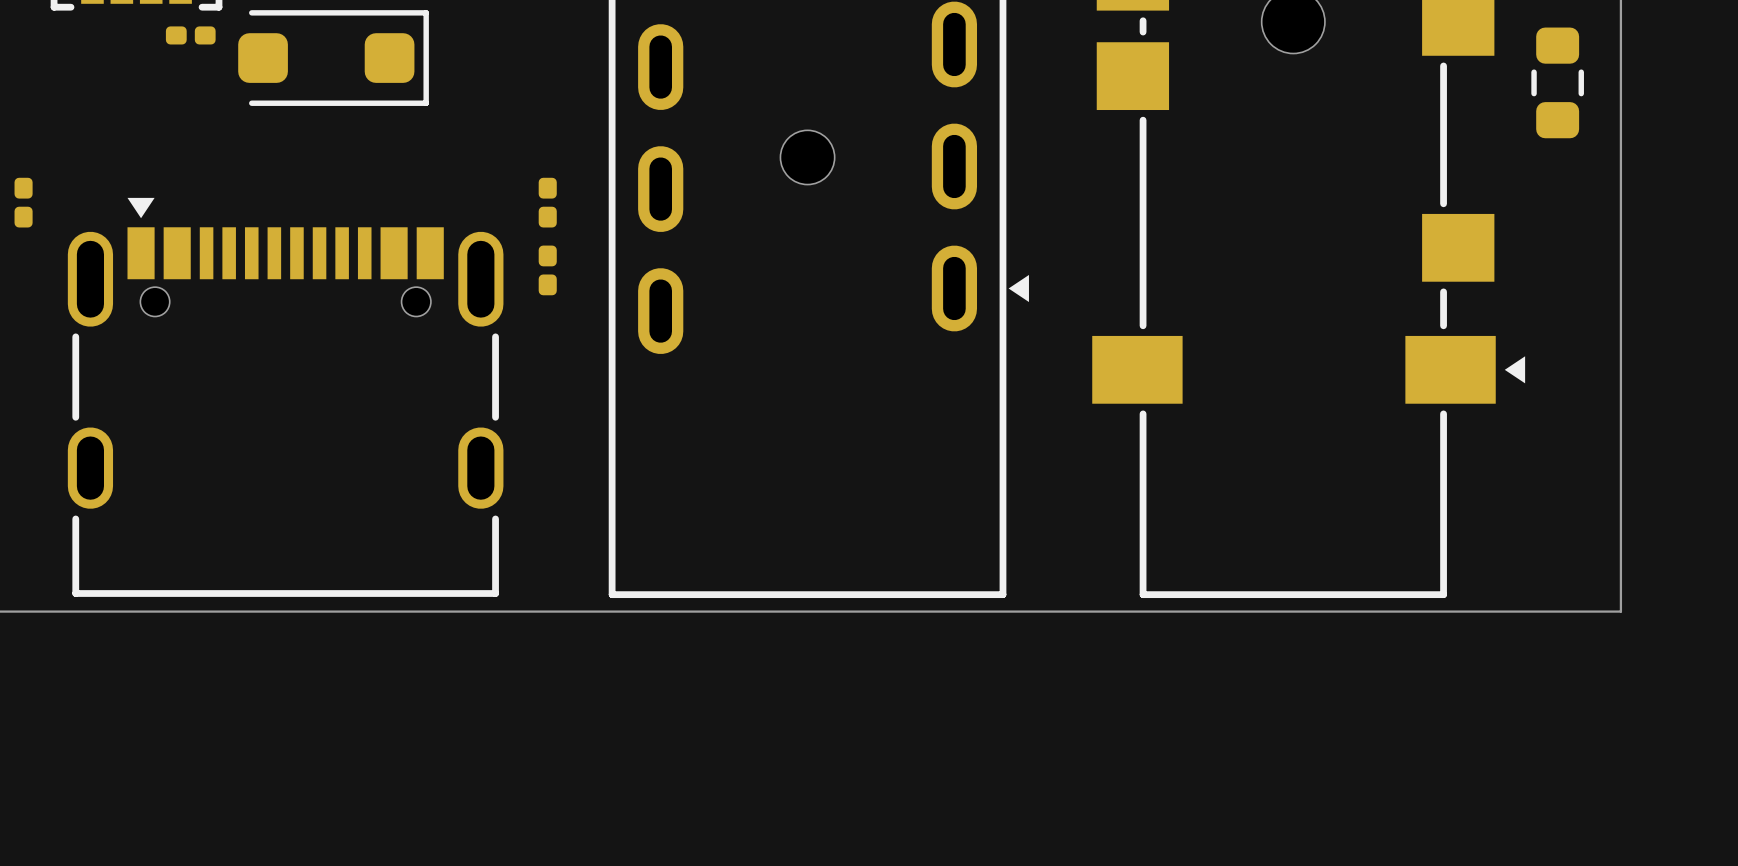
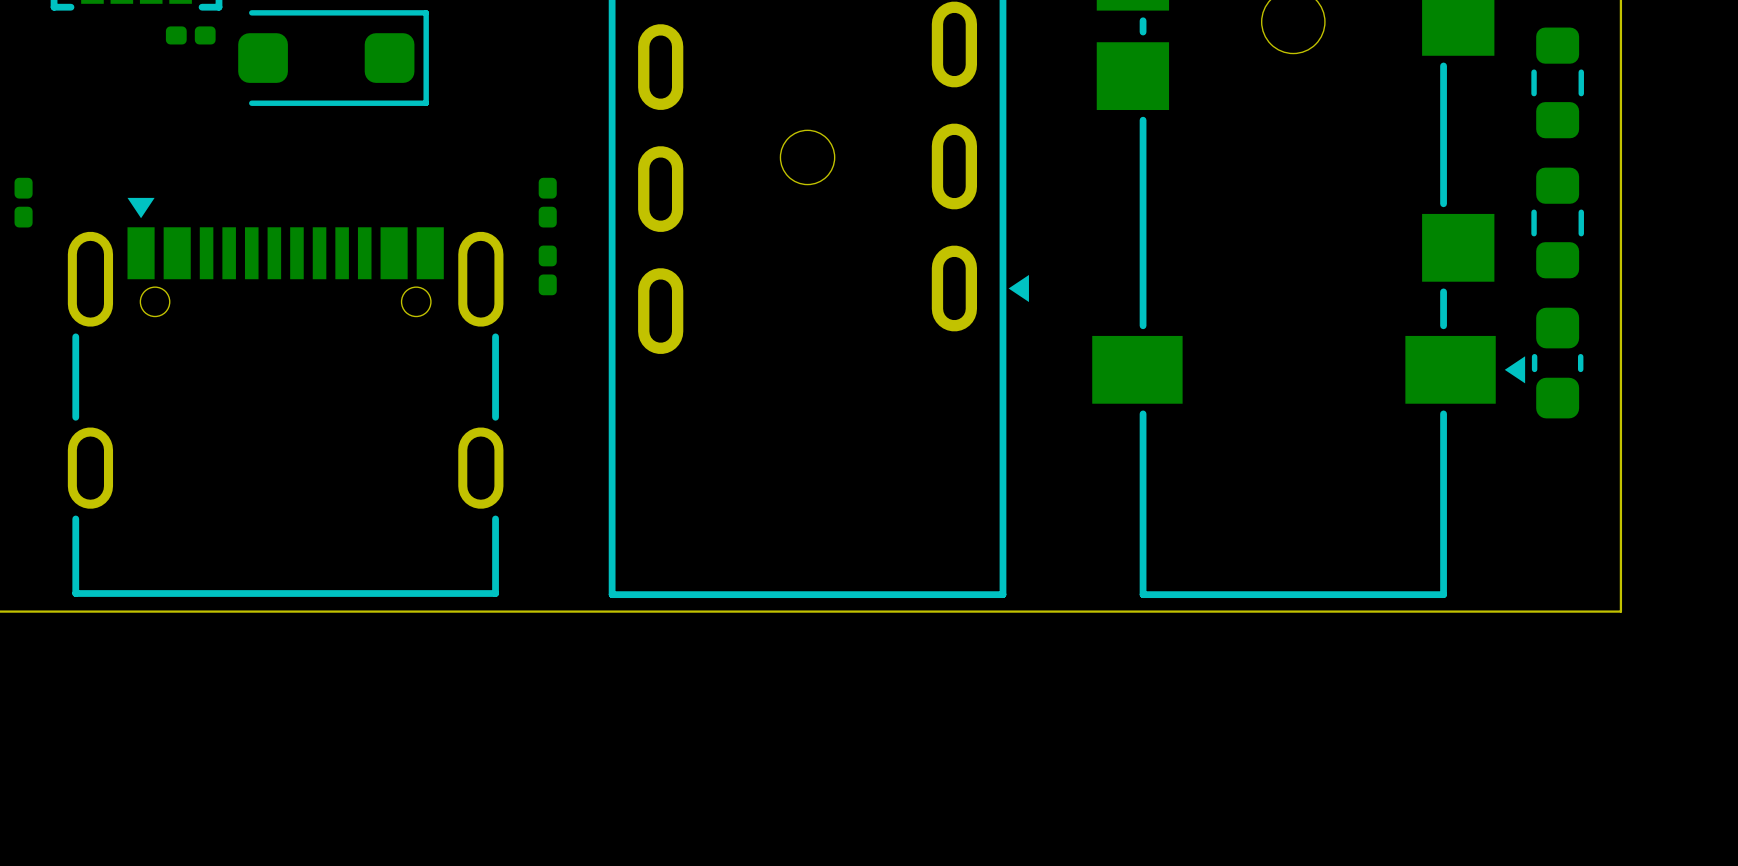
part: none -> (1557, 222)
part: none -> (1557, 363)

